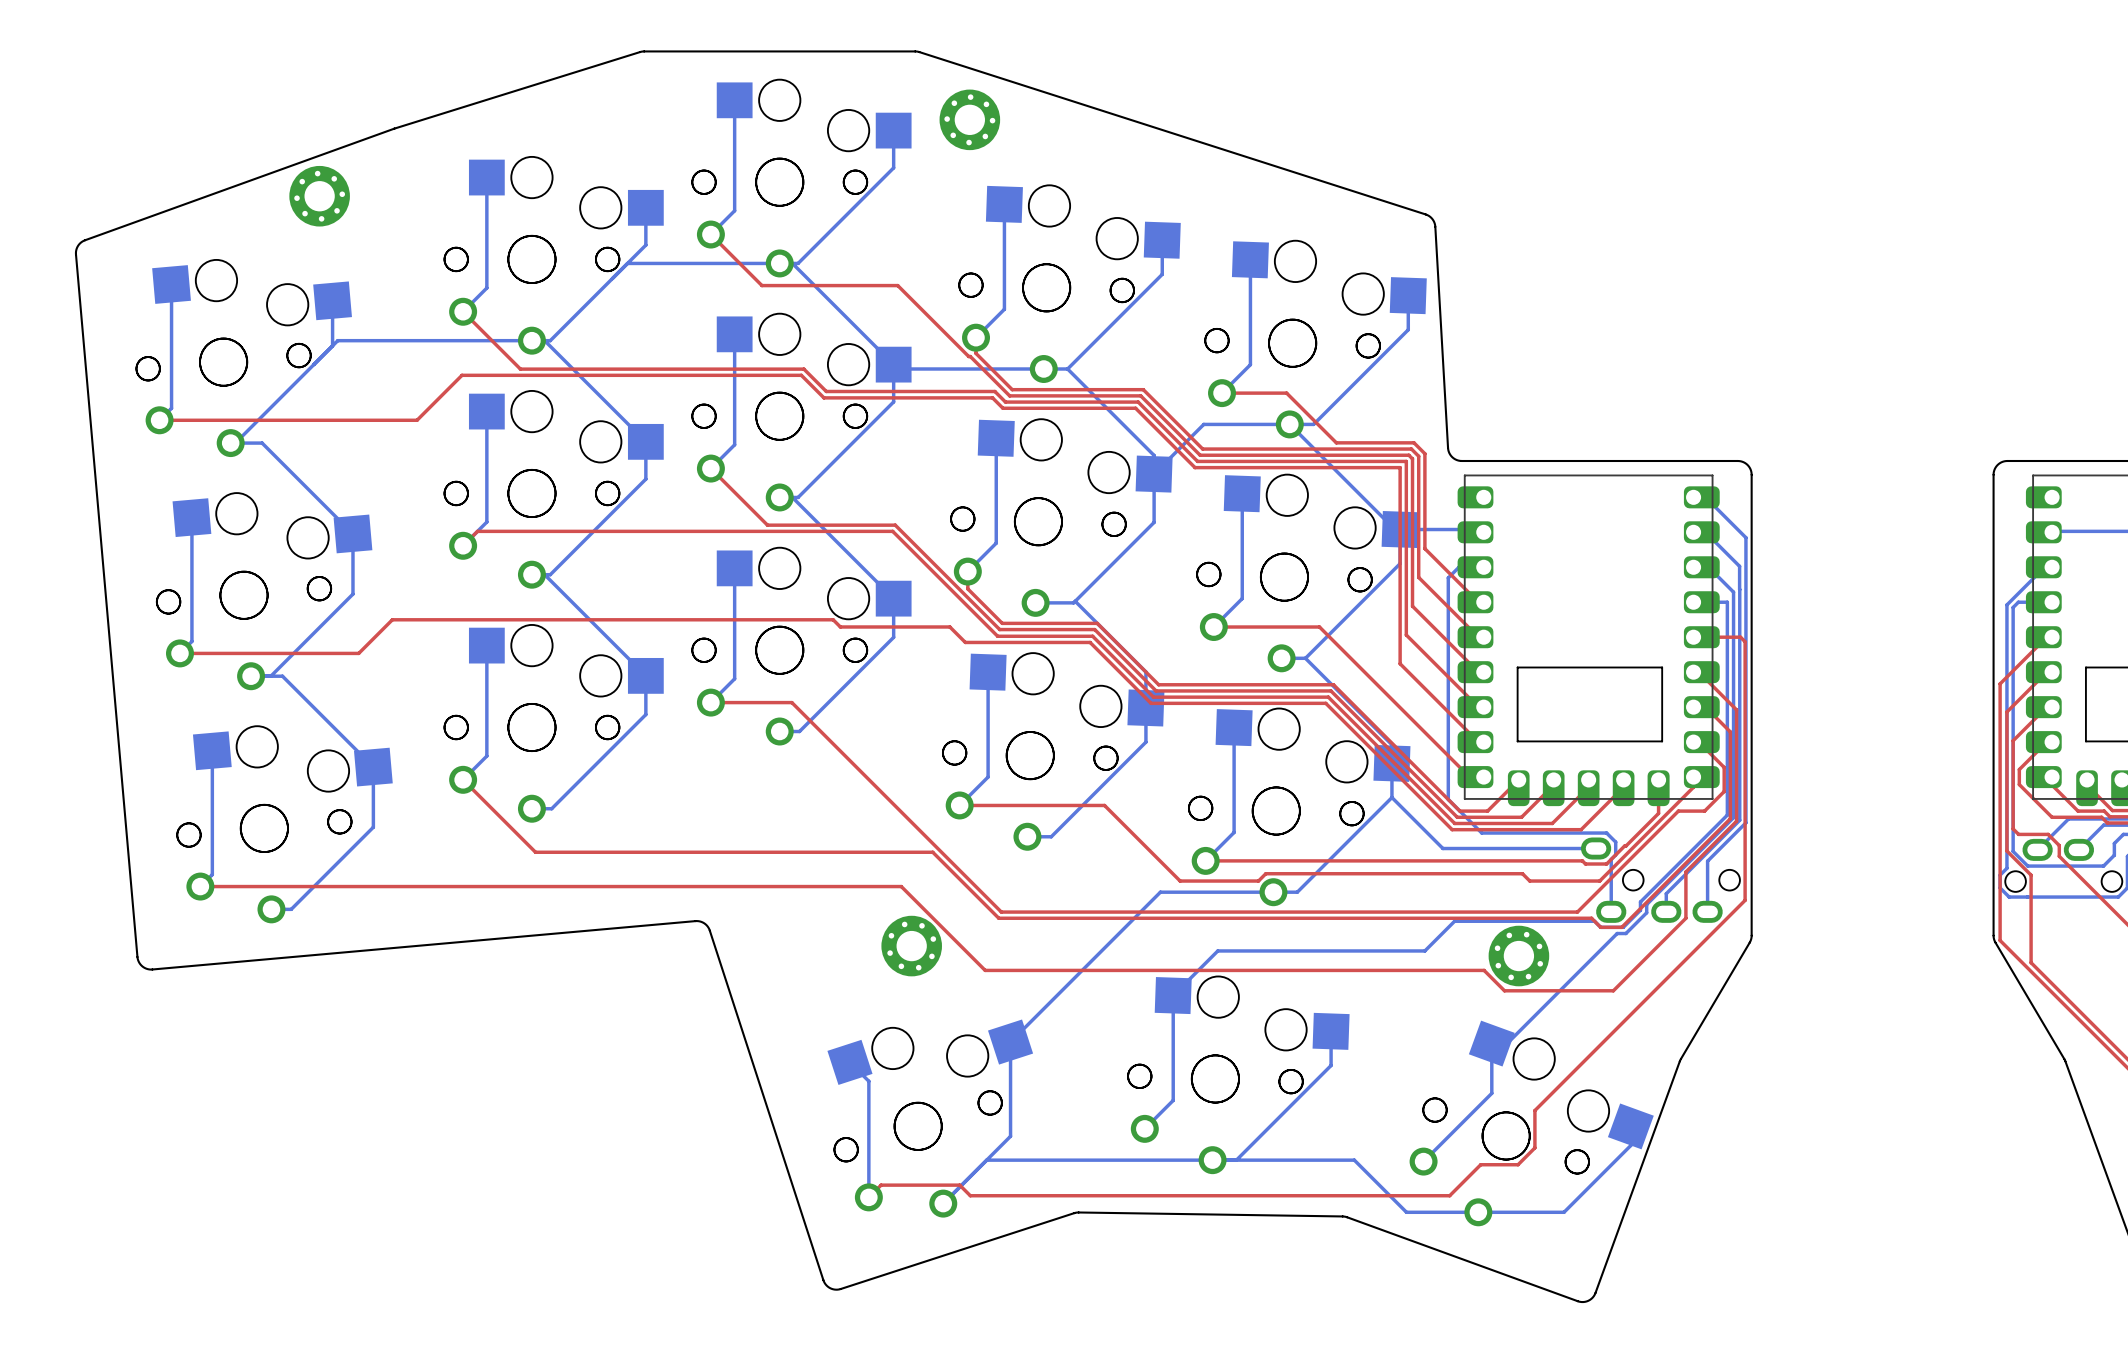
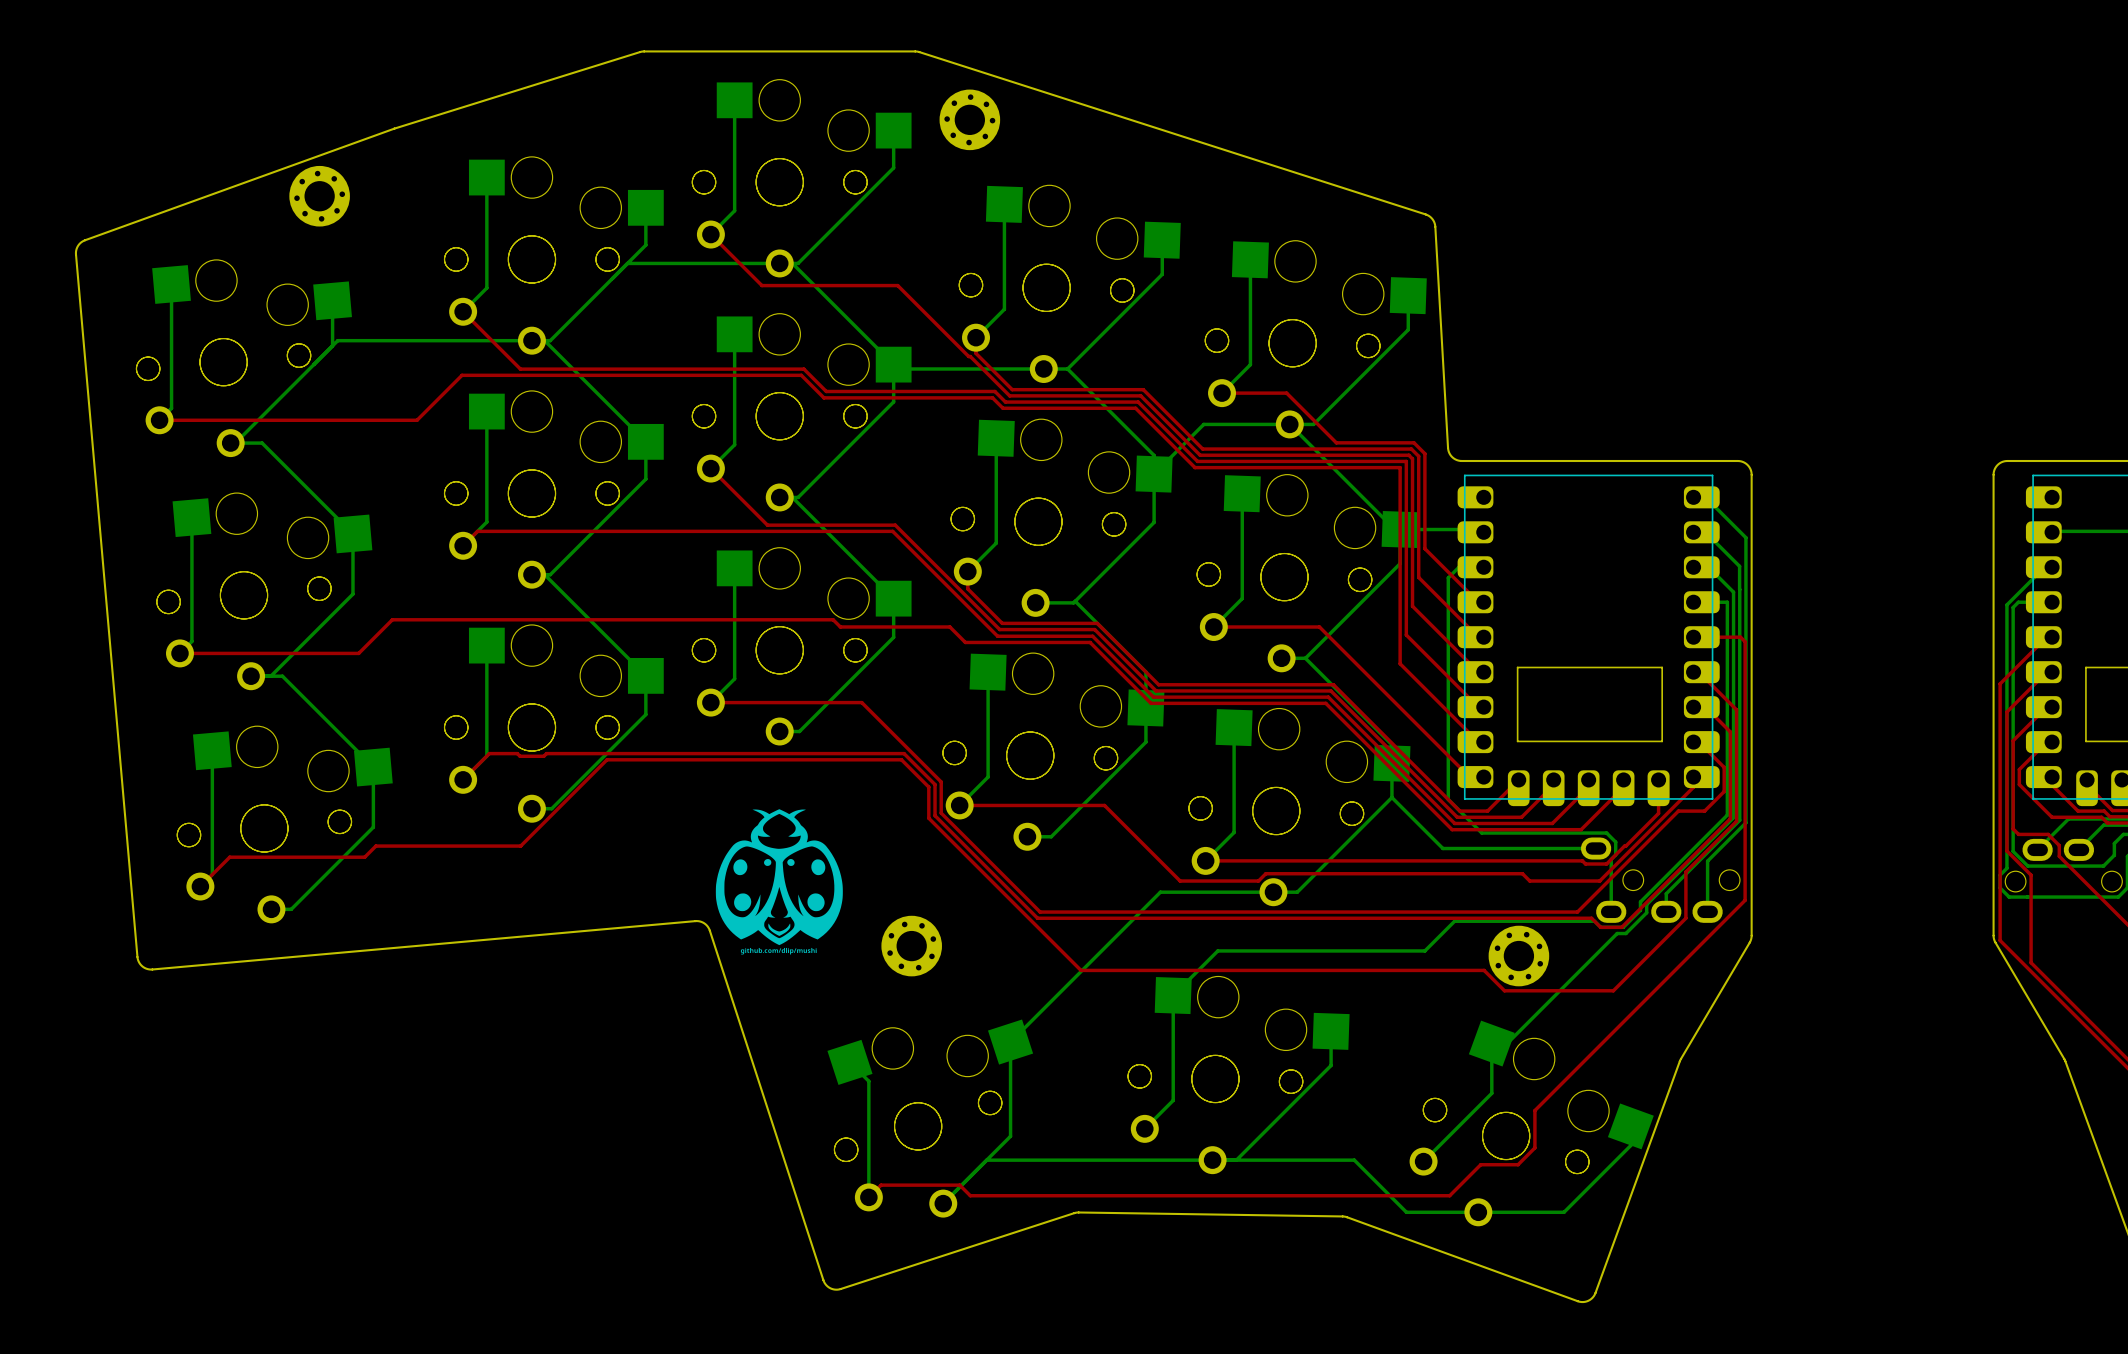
top track: (791, 702) (1001, 912) (1040, 912) -> (791, 702) (861, 702) (941, 781) (941, 813) (1040, 912)
top track: (463, 779) (535, 852) (932, 852) (998, 918) (1037, 918) -> (463, 779) (489, 753) (517, 753) (520, 756) (543, 756) (546, 753) (904, 753) (935, 784) (935, 815) (1037, 918)
drawing: none -> [715, 809, 843, 955]
top track: (200, 886) (901, 886) (985, 970) (1080, 970) -> (200, 886) (229, 857) (364, 857) (375, 846) (520, 846) (606, 759) (901, 759) (928, 787) (928, 818) (1080, 970)

